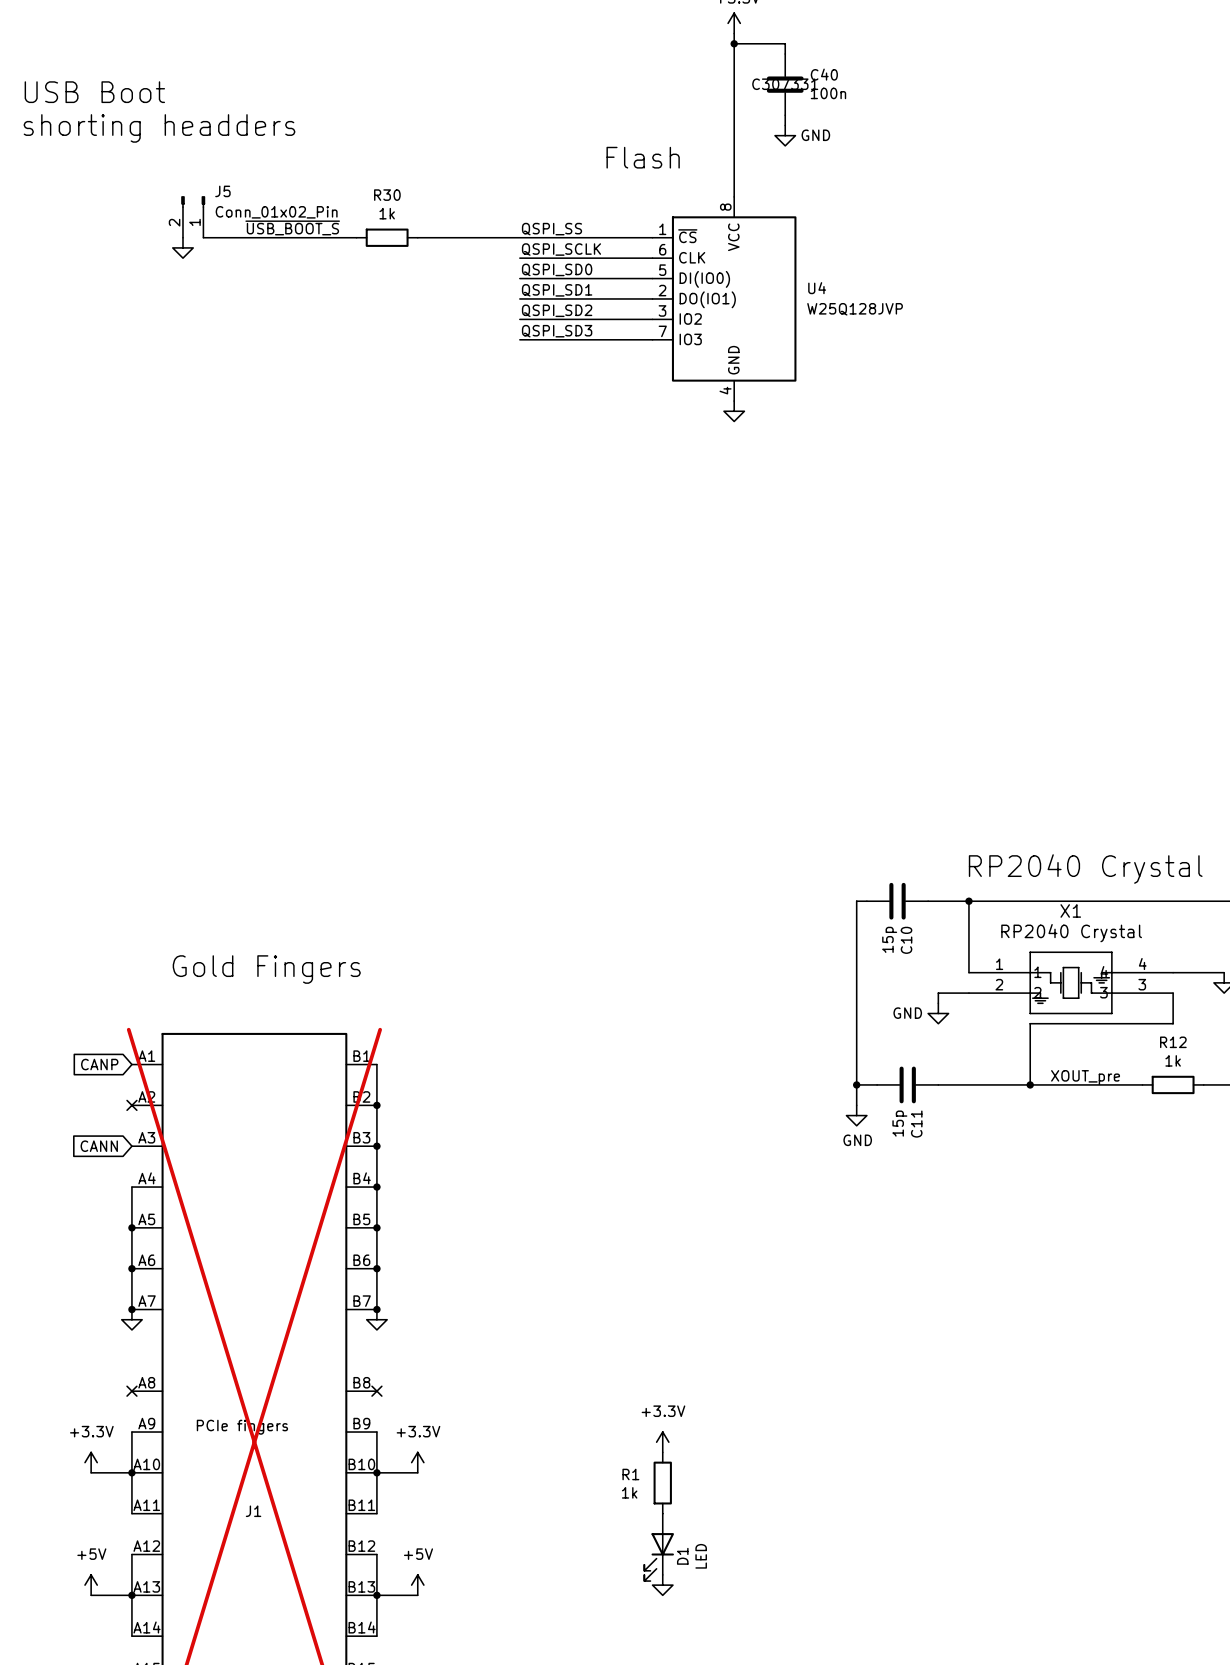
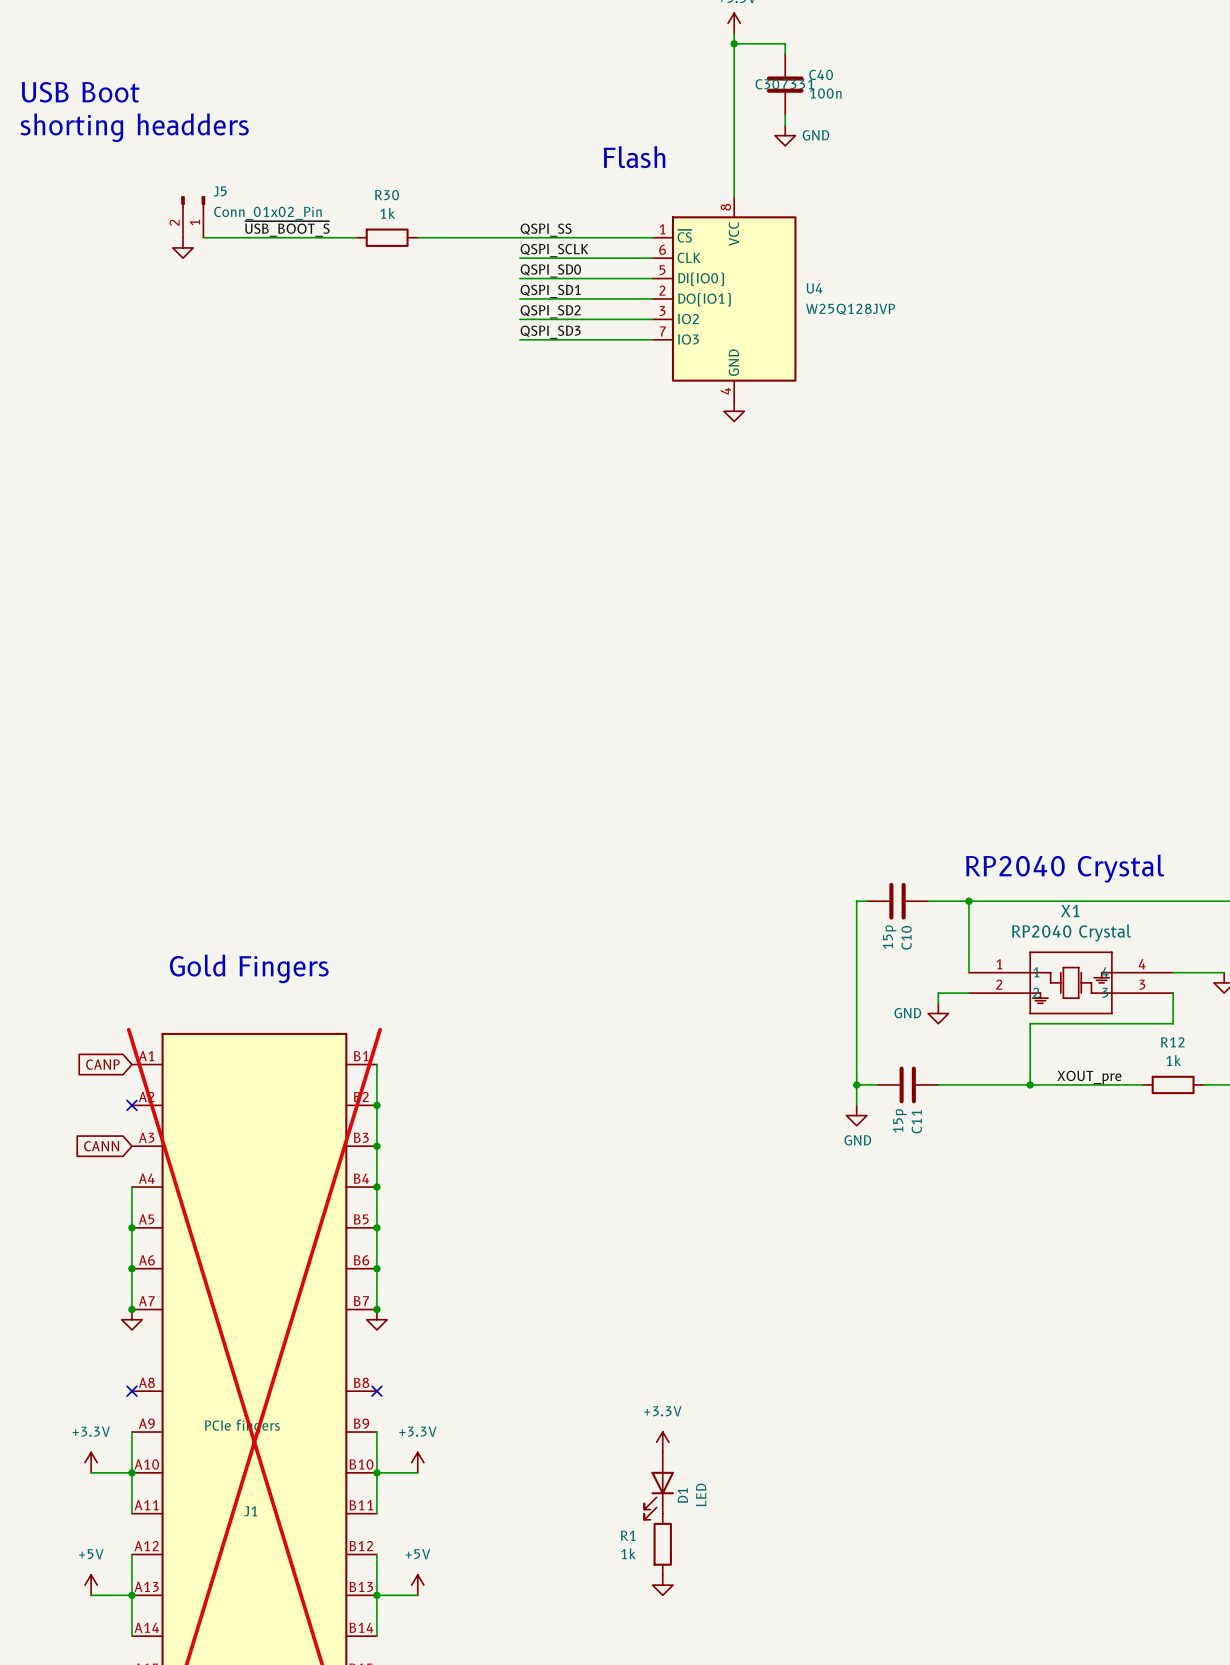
R1 position: (662, 1483) -> (662, 1544)
D1 position: (659, 1547) -> (659, 1486)

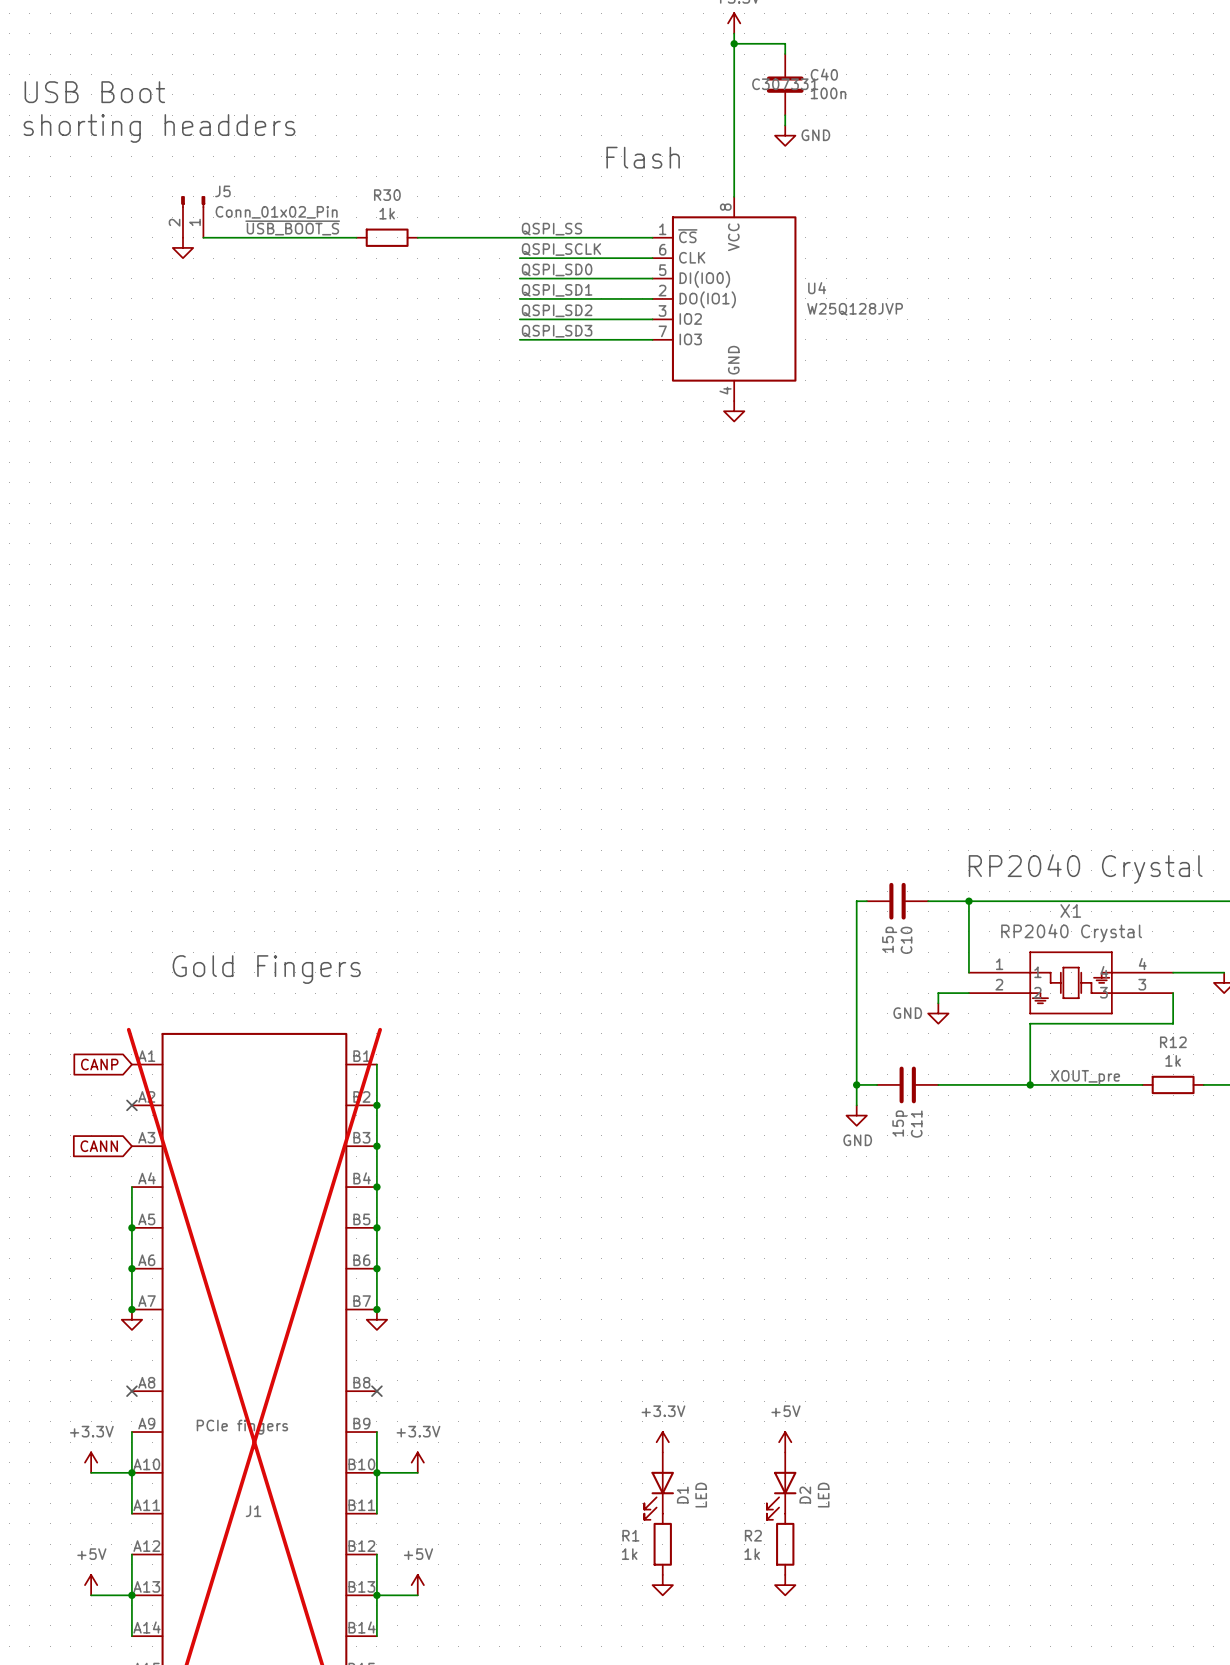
power symbol: none -> +5V (785, 1442)
D2: none -> LED (781, 1486)
R2: none -> 1k (785, 1544)
power symbol: none -> (785, 1585)

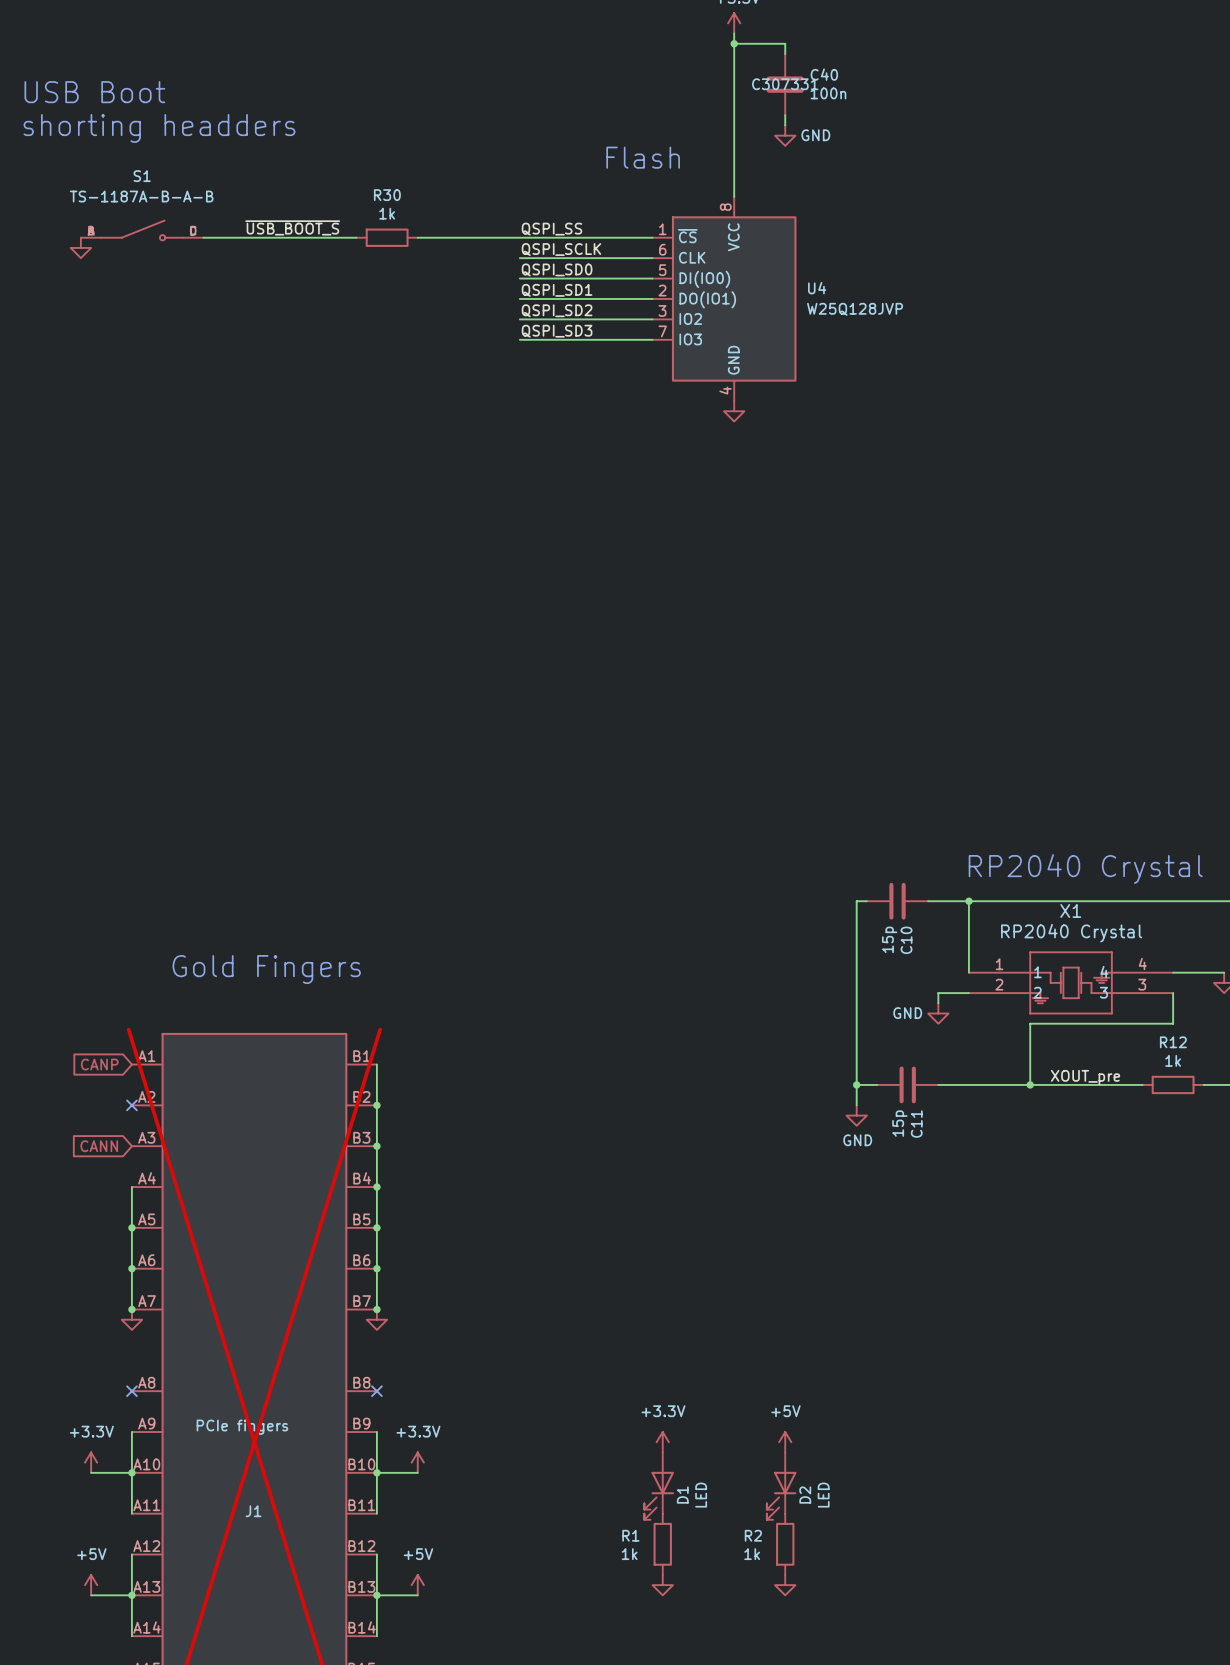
J5: Conn_01x02_Pin (193, 217) -> none
S1: none -> TS-1187A-B-A-B (142, 230)
power symbol position: (182, 247) -> (80, 247)

